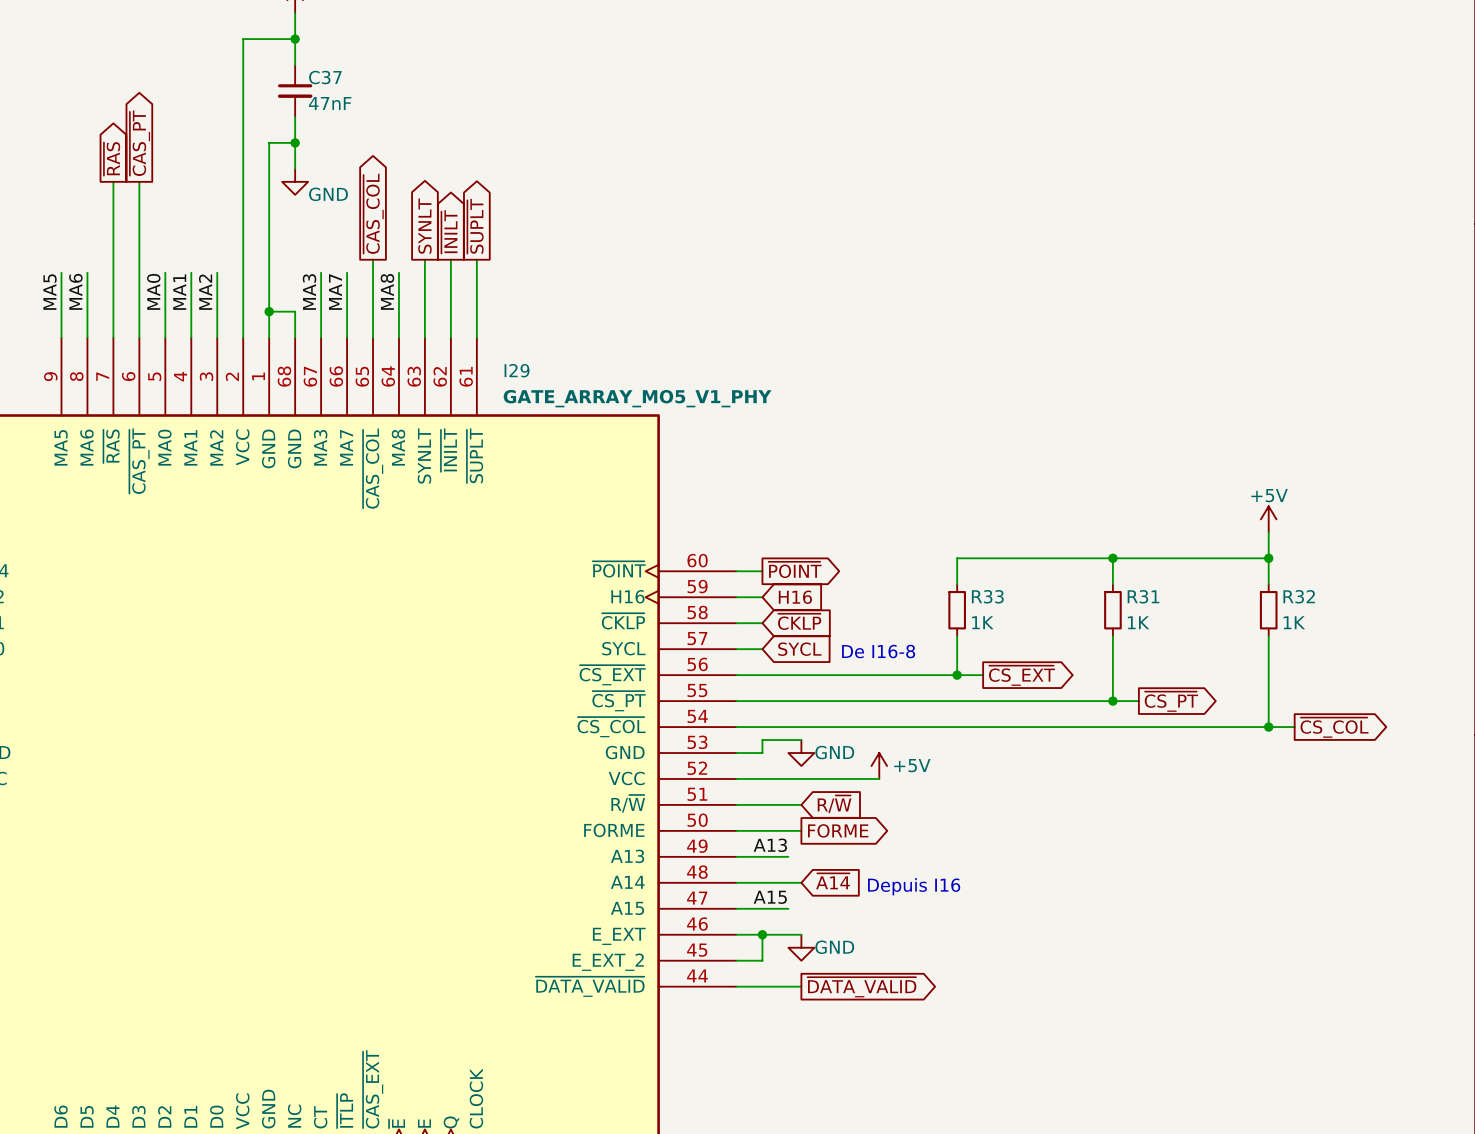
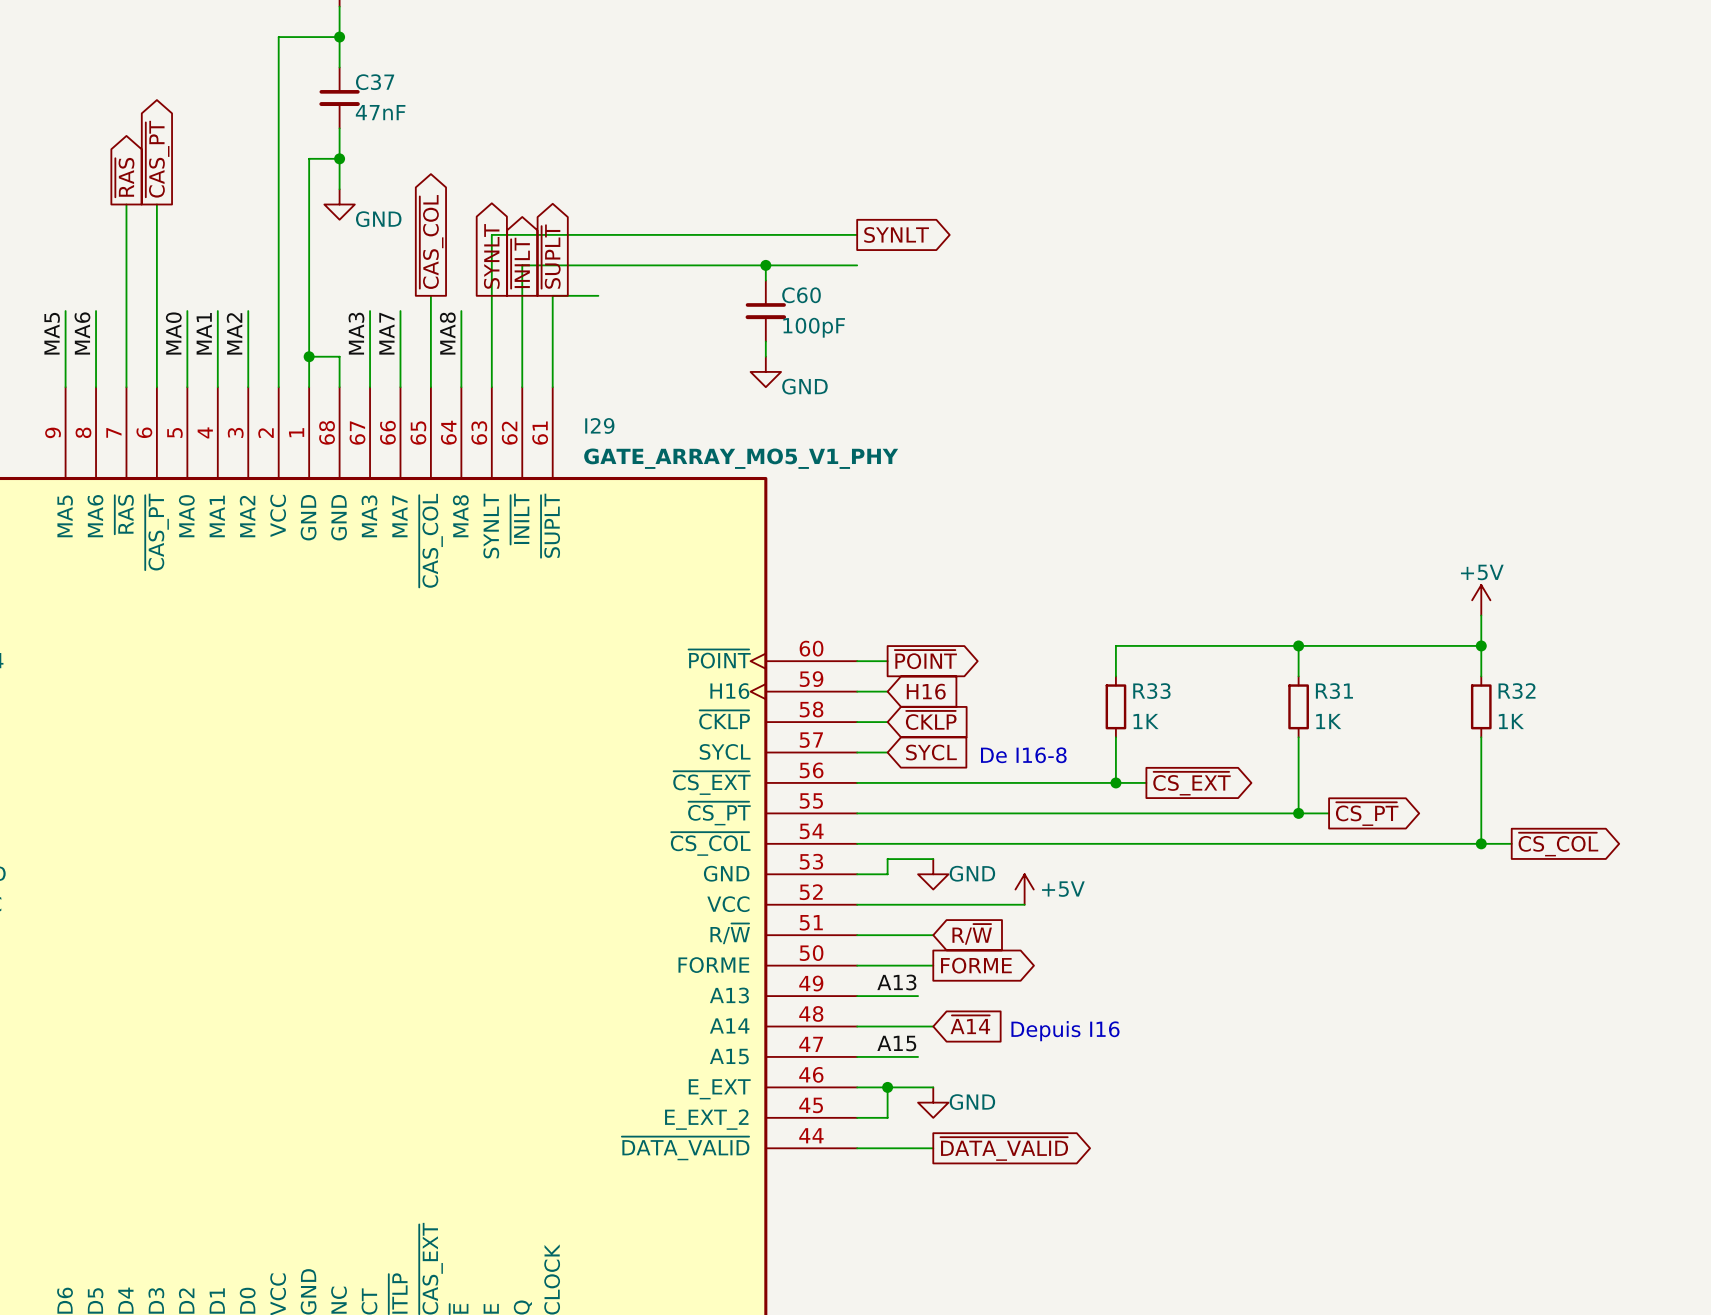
wire: none -> (857, 234) (491, 234) (491, 295)
global label: none -> SYNLT (896, 234)
wire: none -> (765, 265) (765, 280)
junction: none -> (765, 265)
wire: none -> (857, 265) (522, 265) (522, 295)
wire: none -> (552, 295) (598, 295)
C60: none -> 100pF (765, 311)
wire: none -> (765, 341) (765, 356)
power symbol: none -> GND (765, 371)

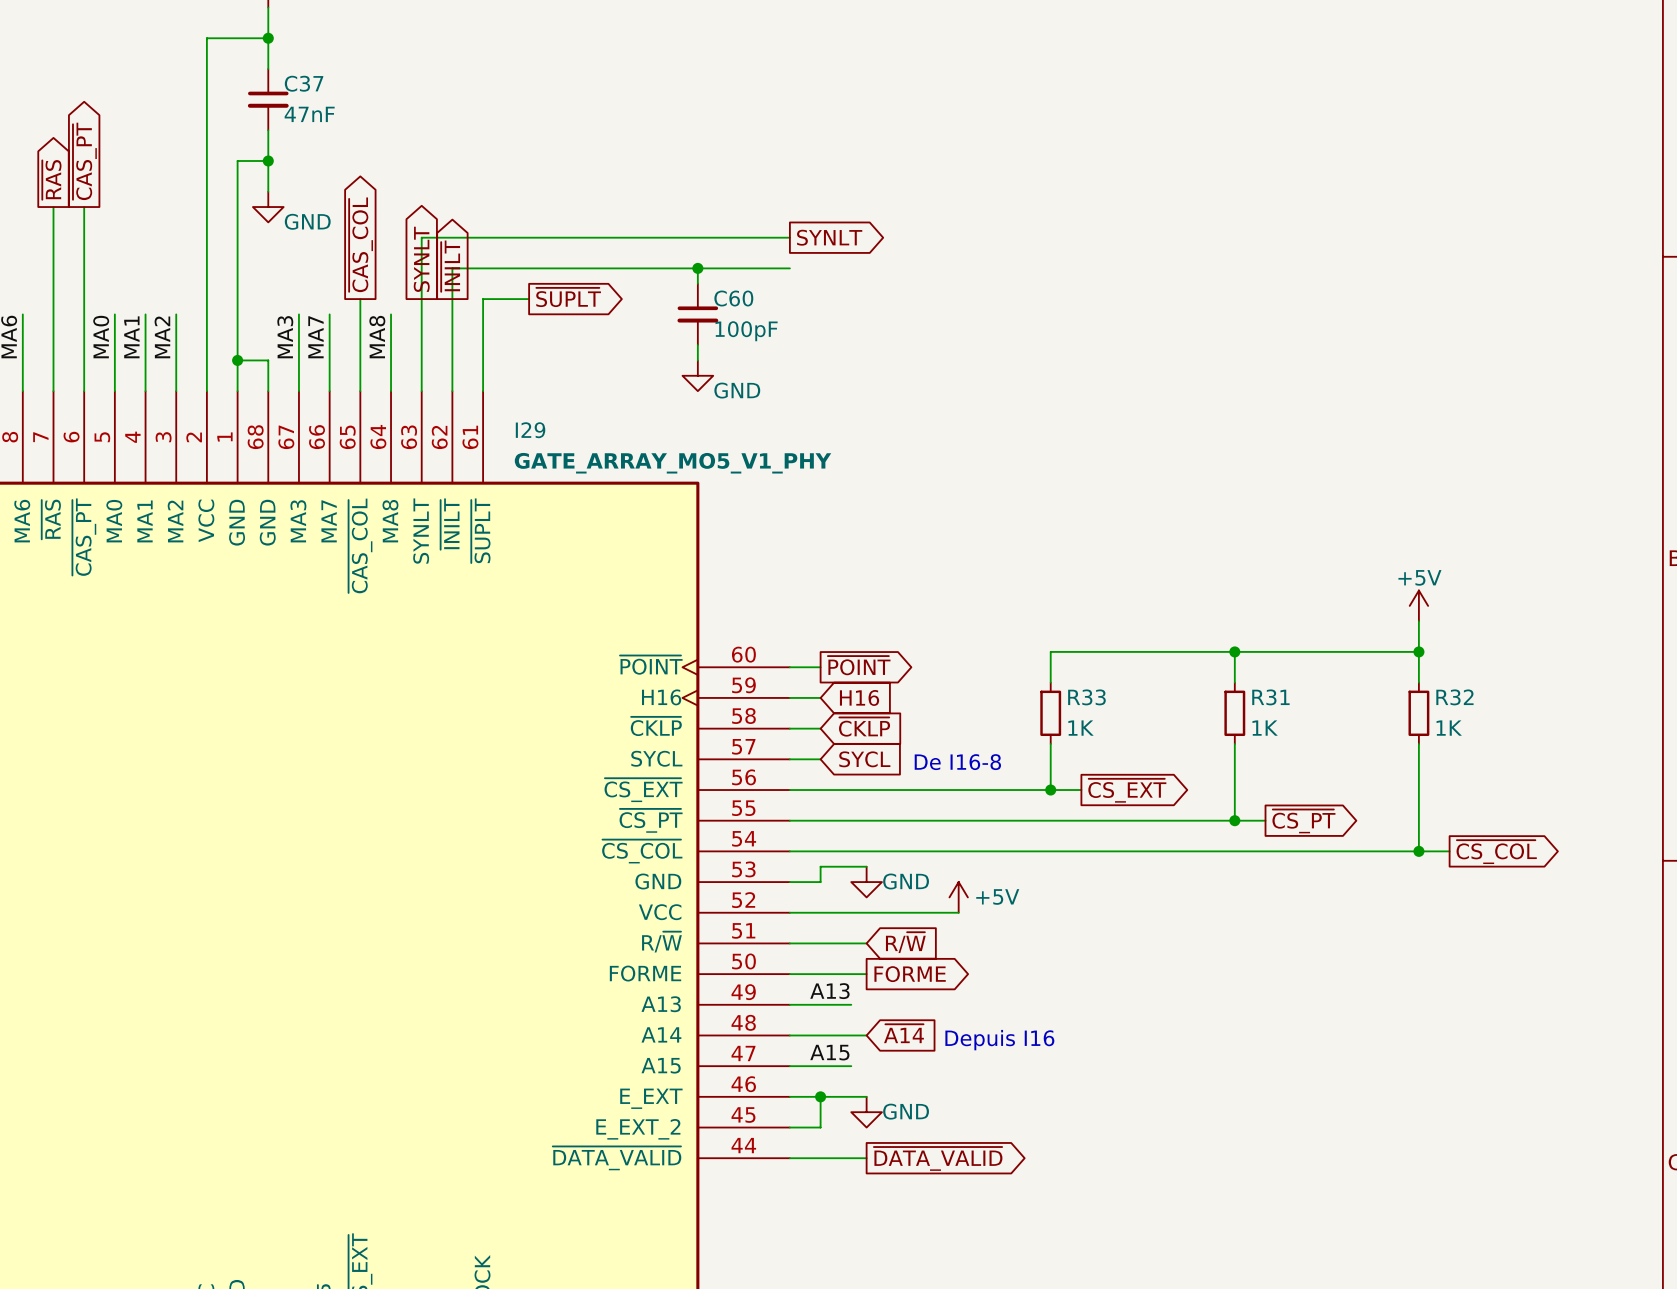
global label rotation: 0° (551, 256) -> 90° clockwise (568, 297)

